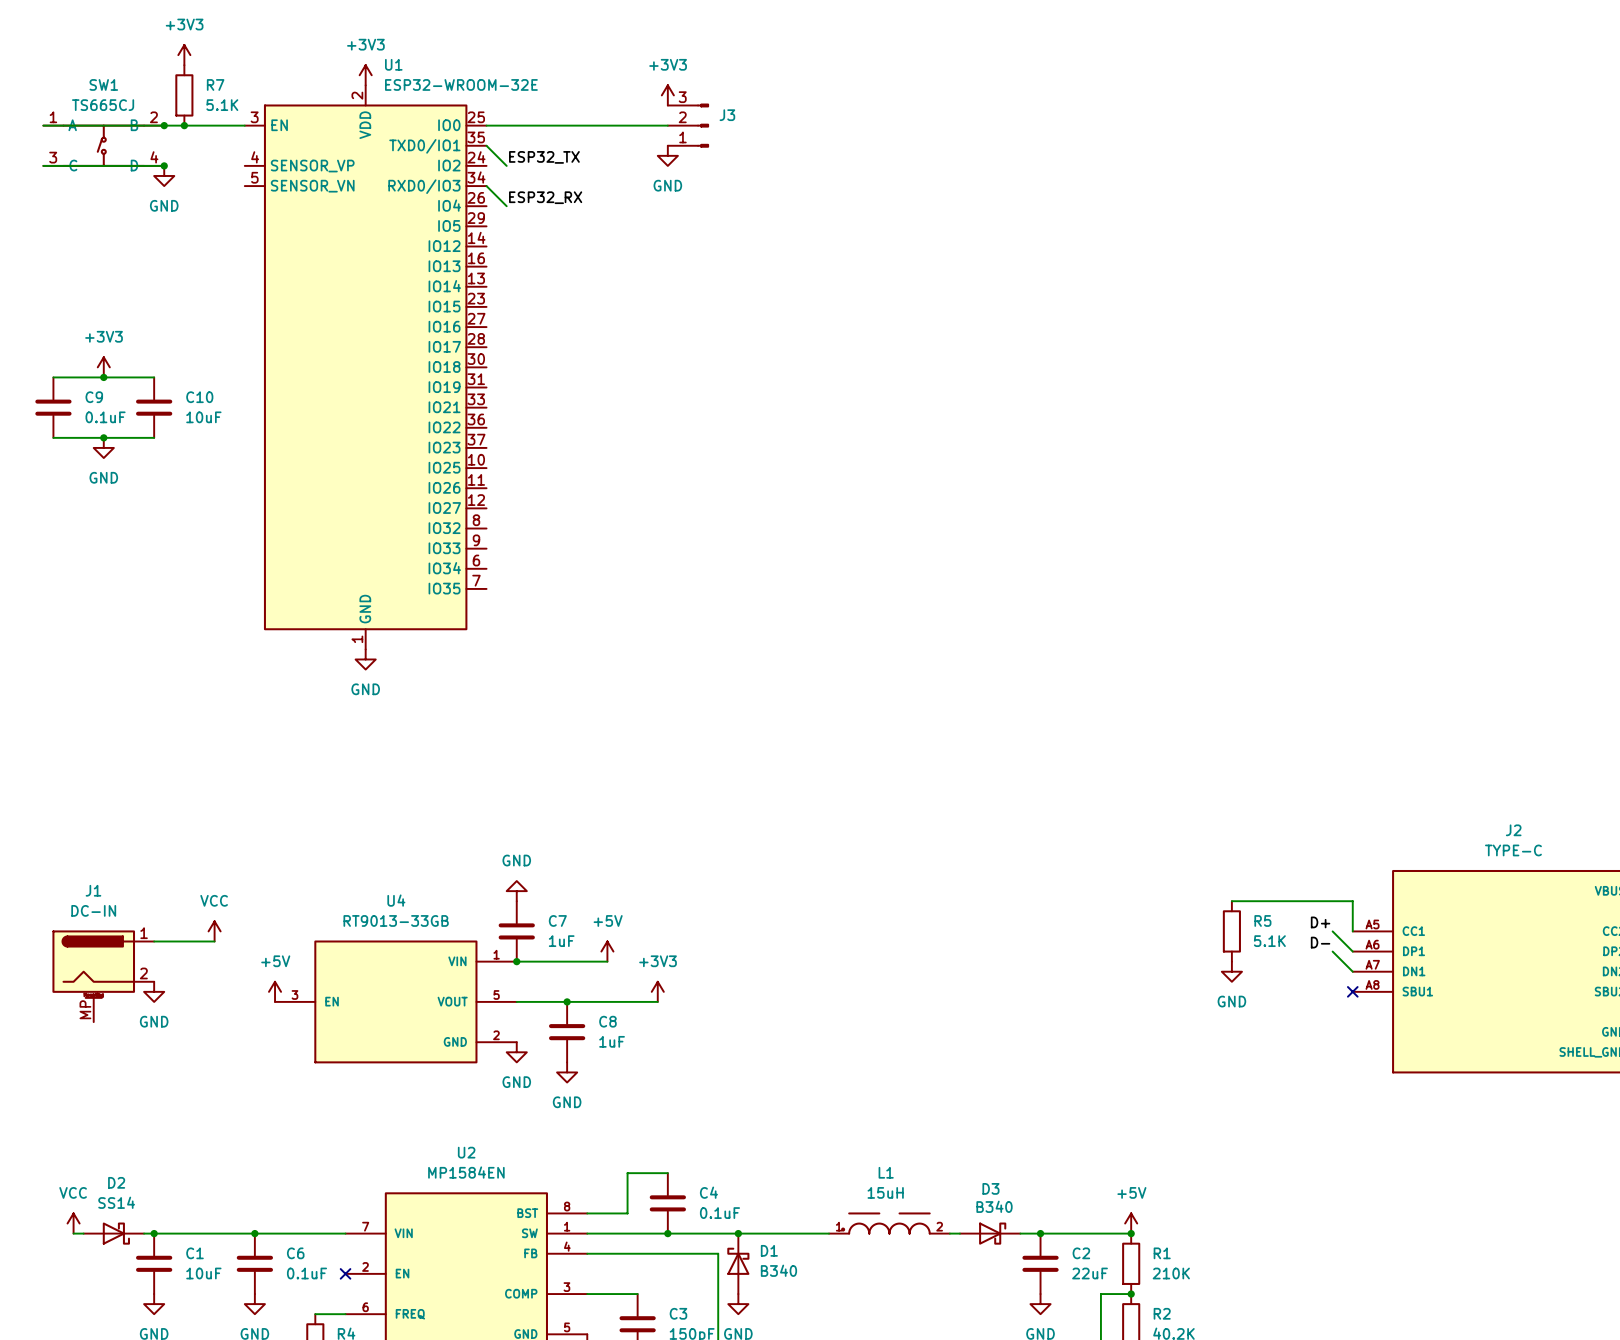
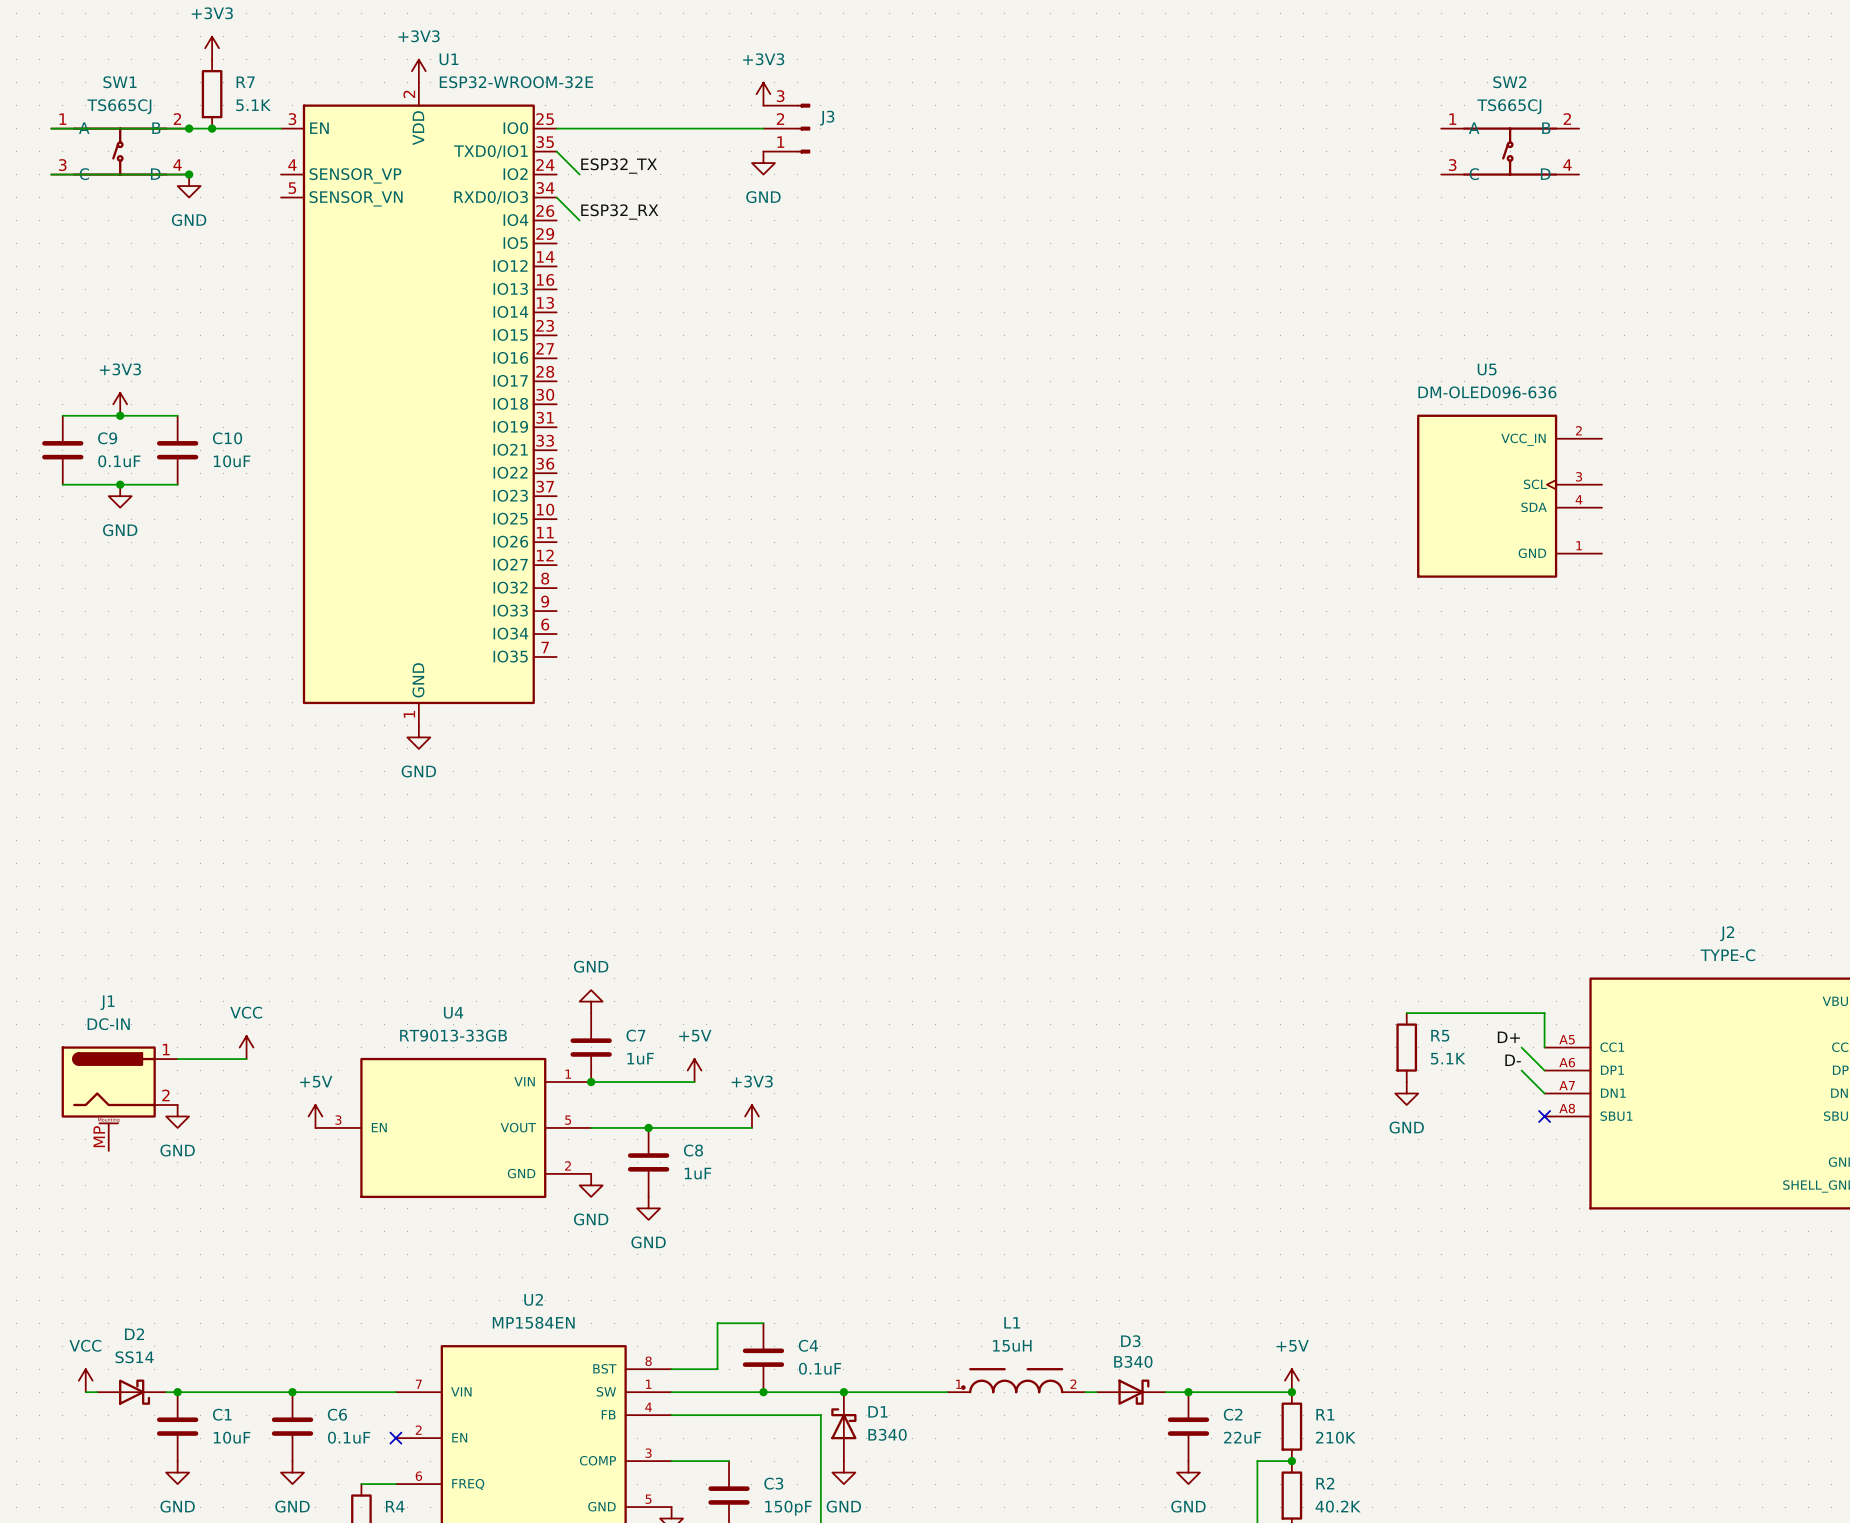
SW2: none -> TS665CJ (1510, 151)
U5: none -> DM-OLED096-636 (1509, 496)

